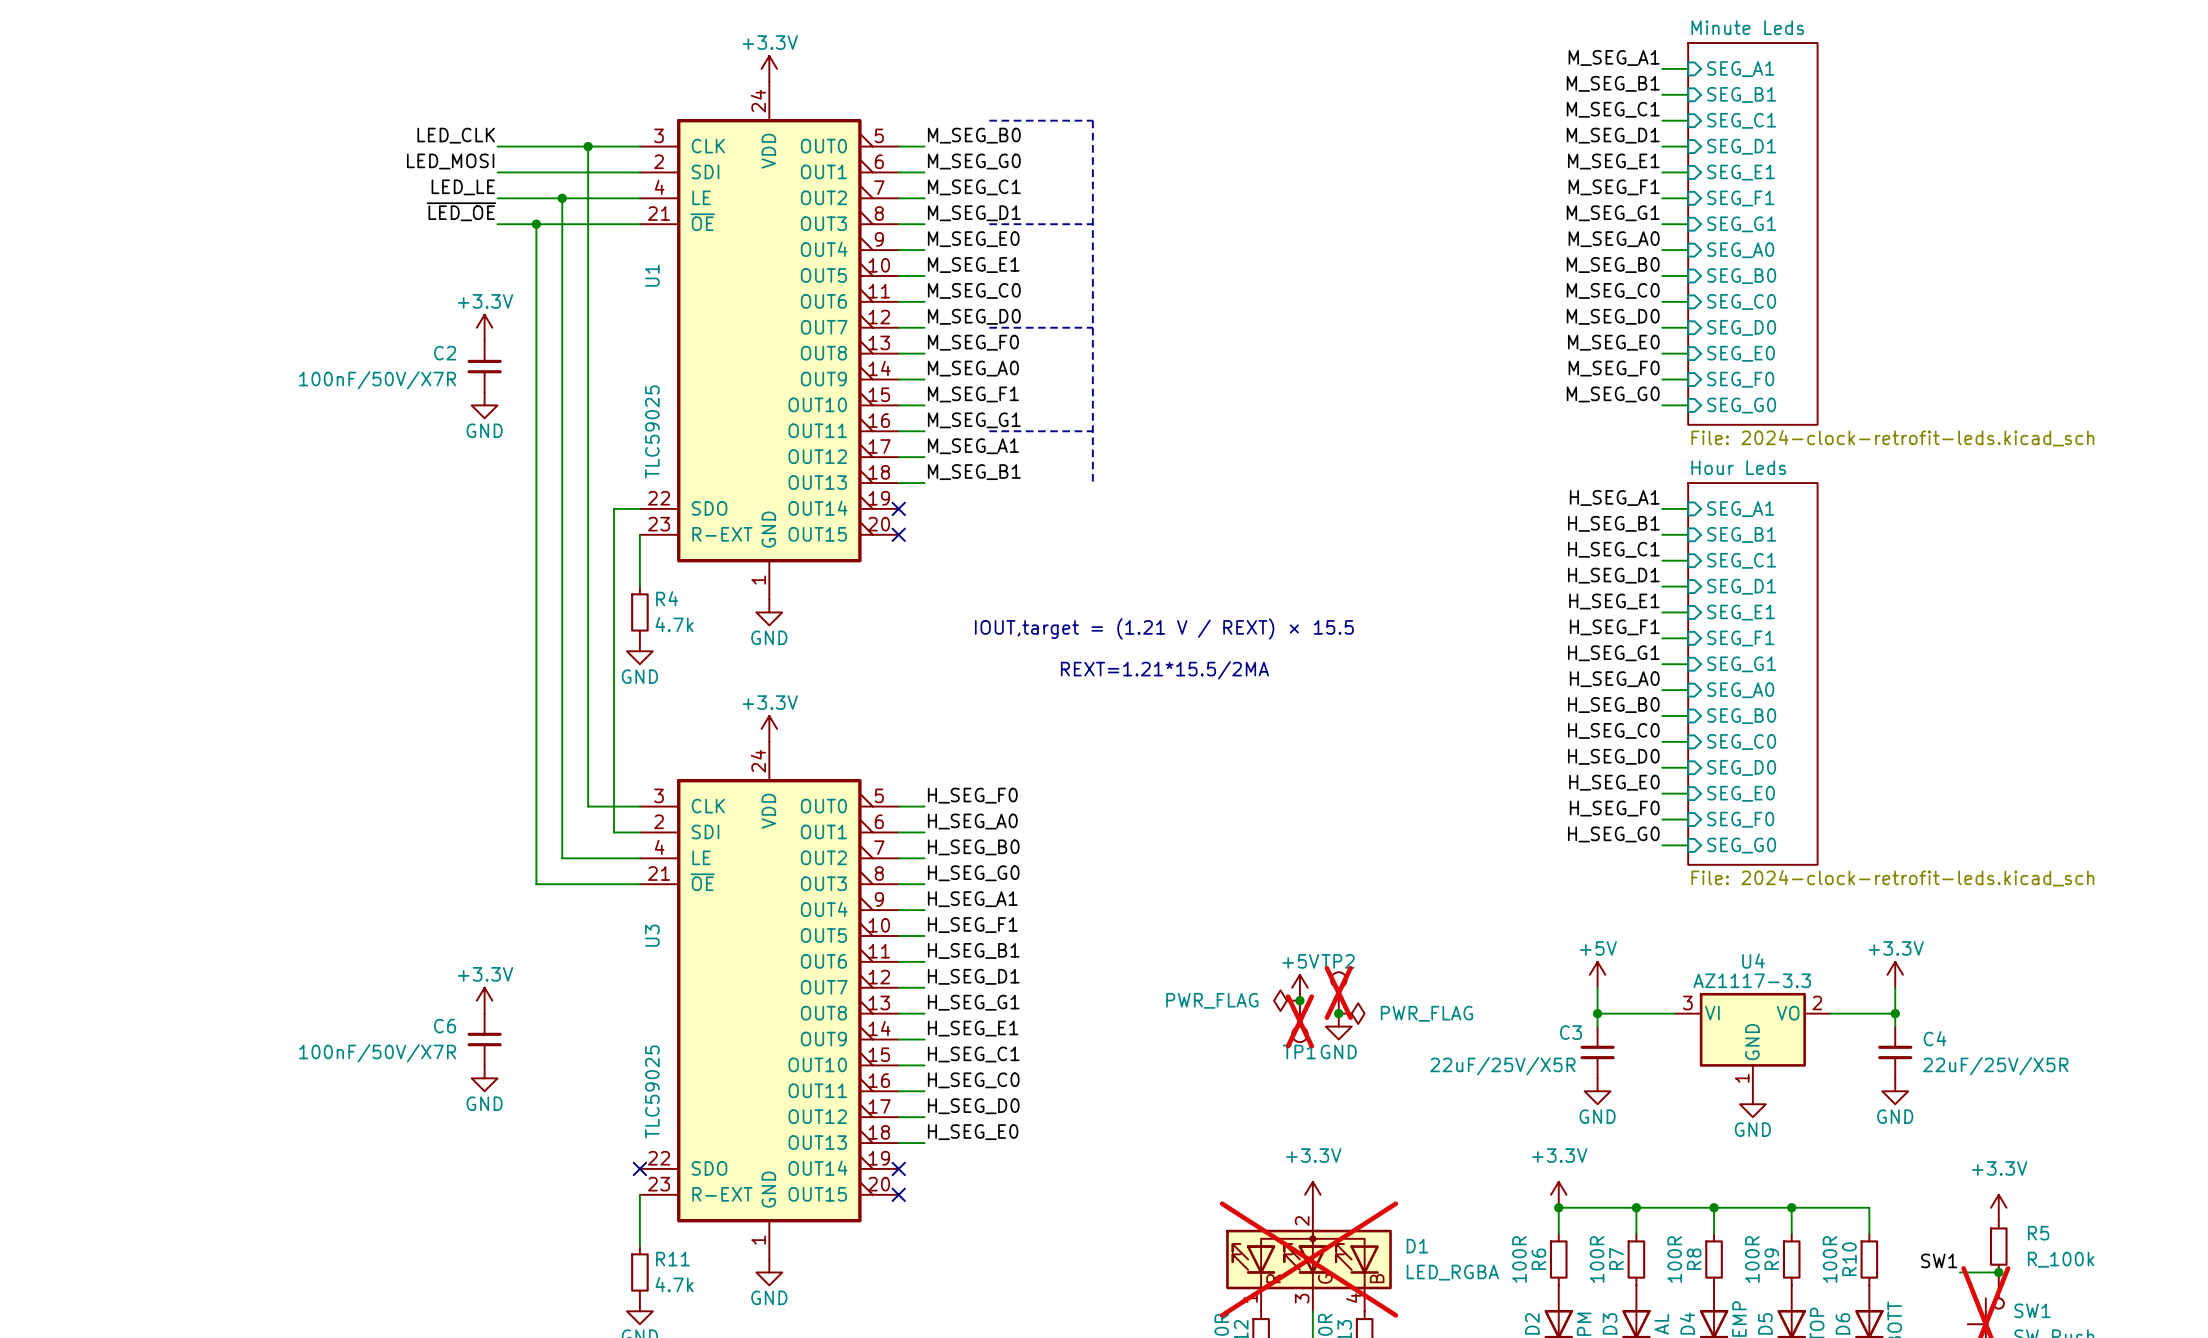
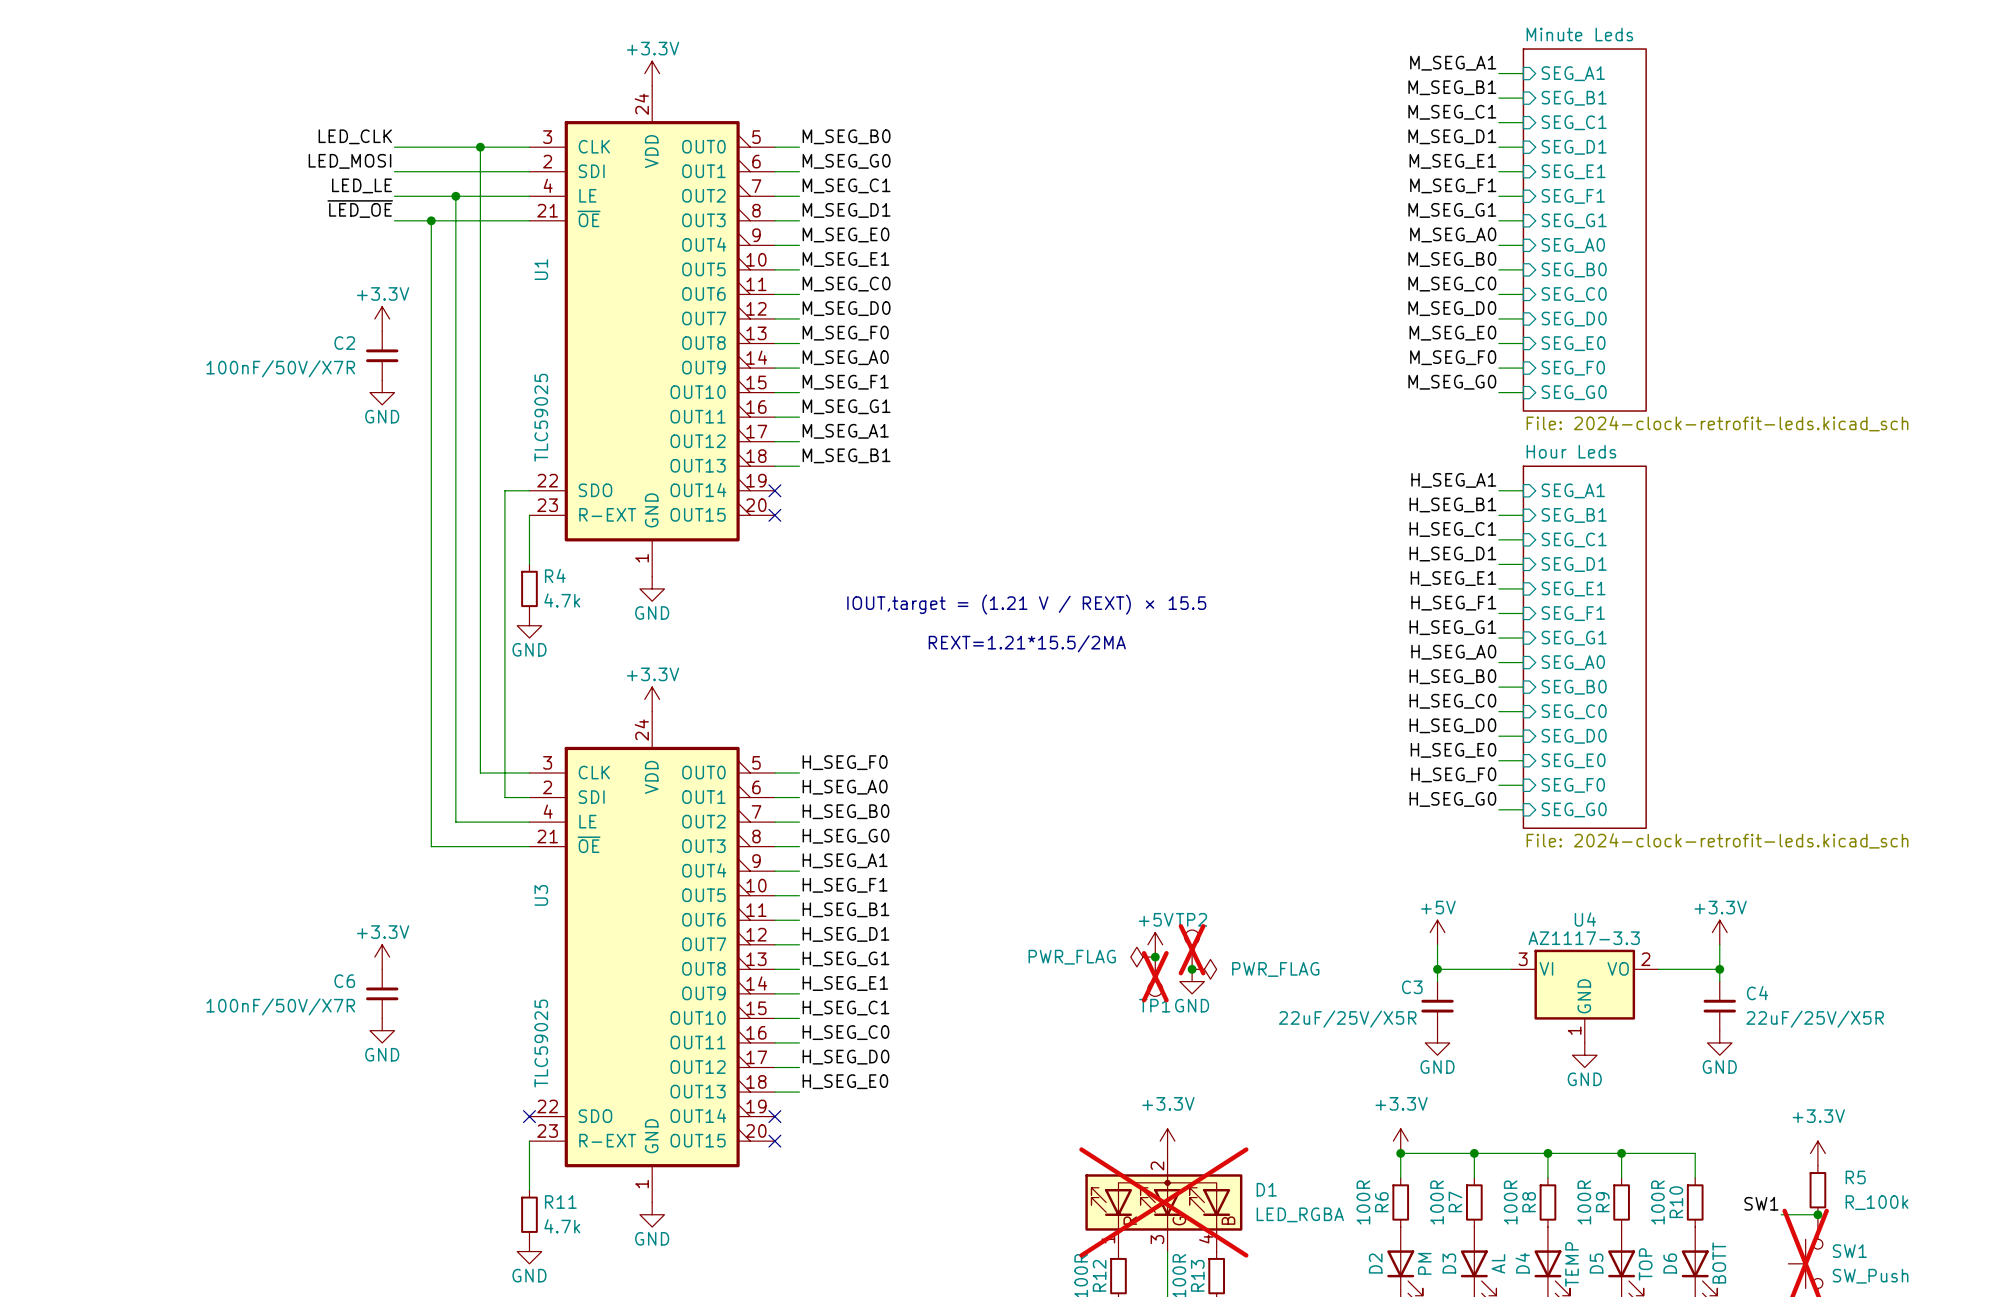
line: (989, 120) (1092, 120) (1092, 483) -> none
line: (989, 224) (1092, 224) -> none
line: (989, 327) (1092, 327) -> none
line: (989, 431) (1092, 431) -> none

